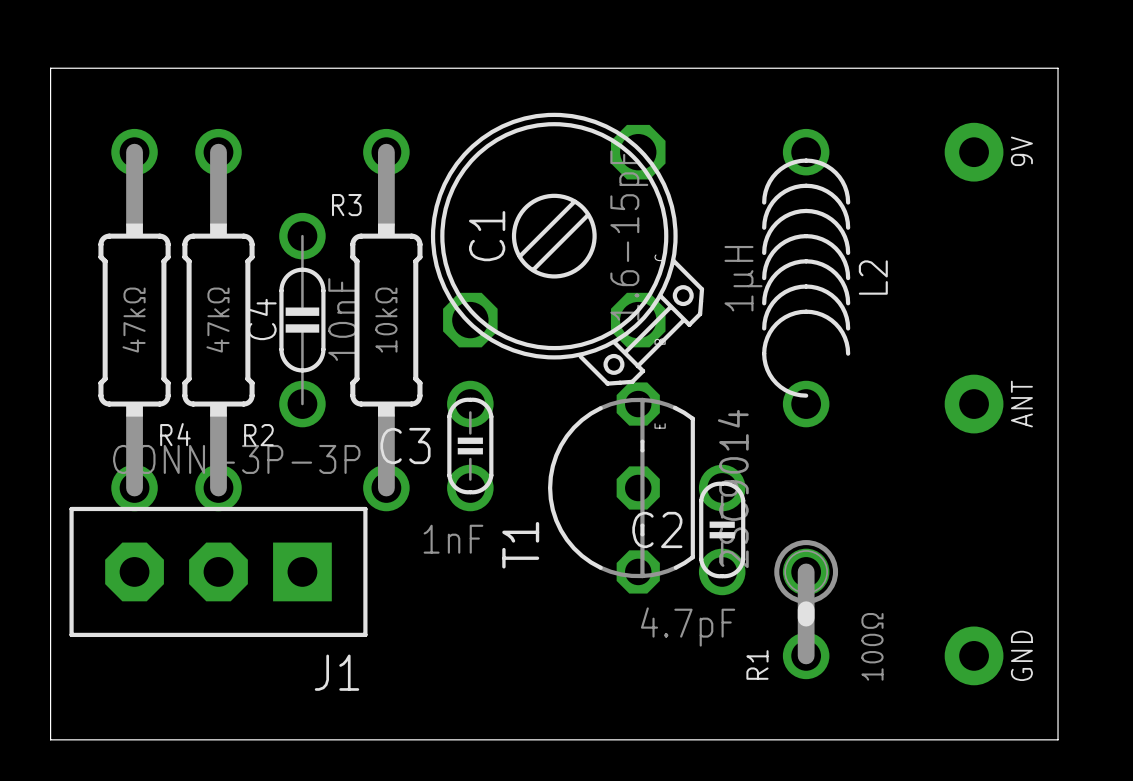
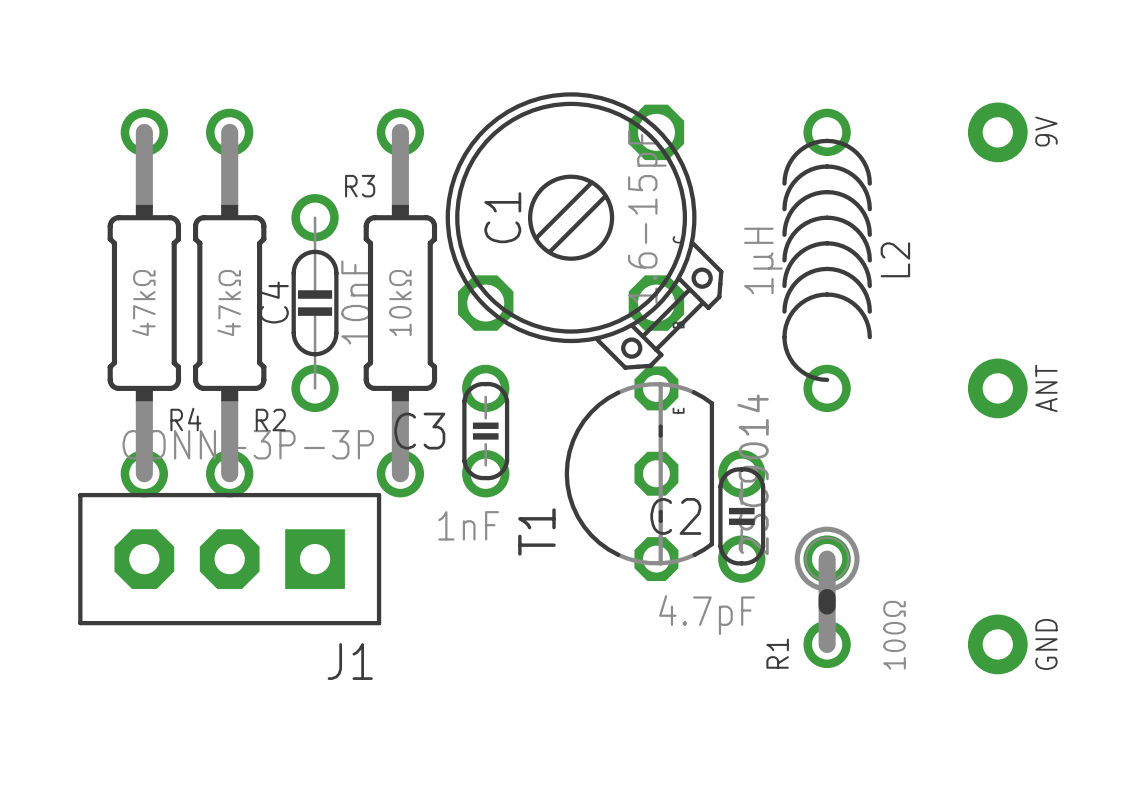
board edge: (50, 68) (50, 739) (1058, 739) (1058, 68) (50, 68) -> none

